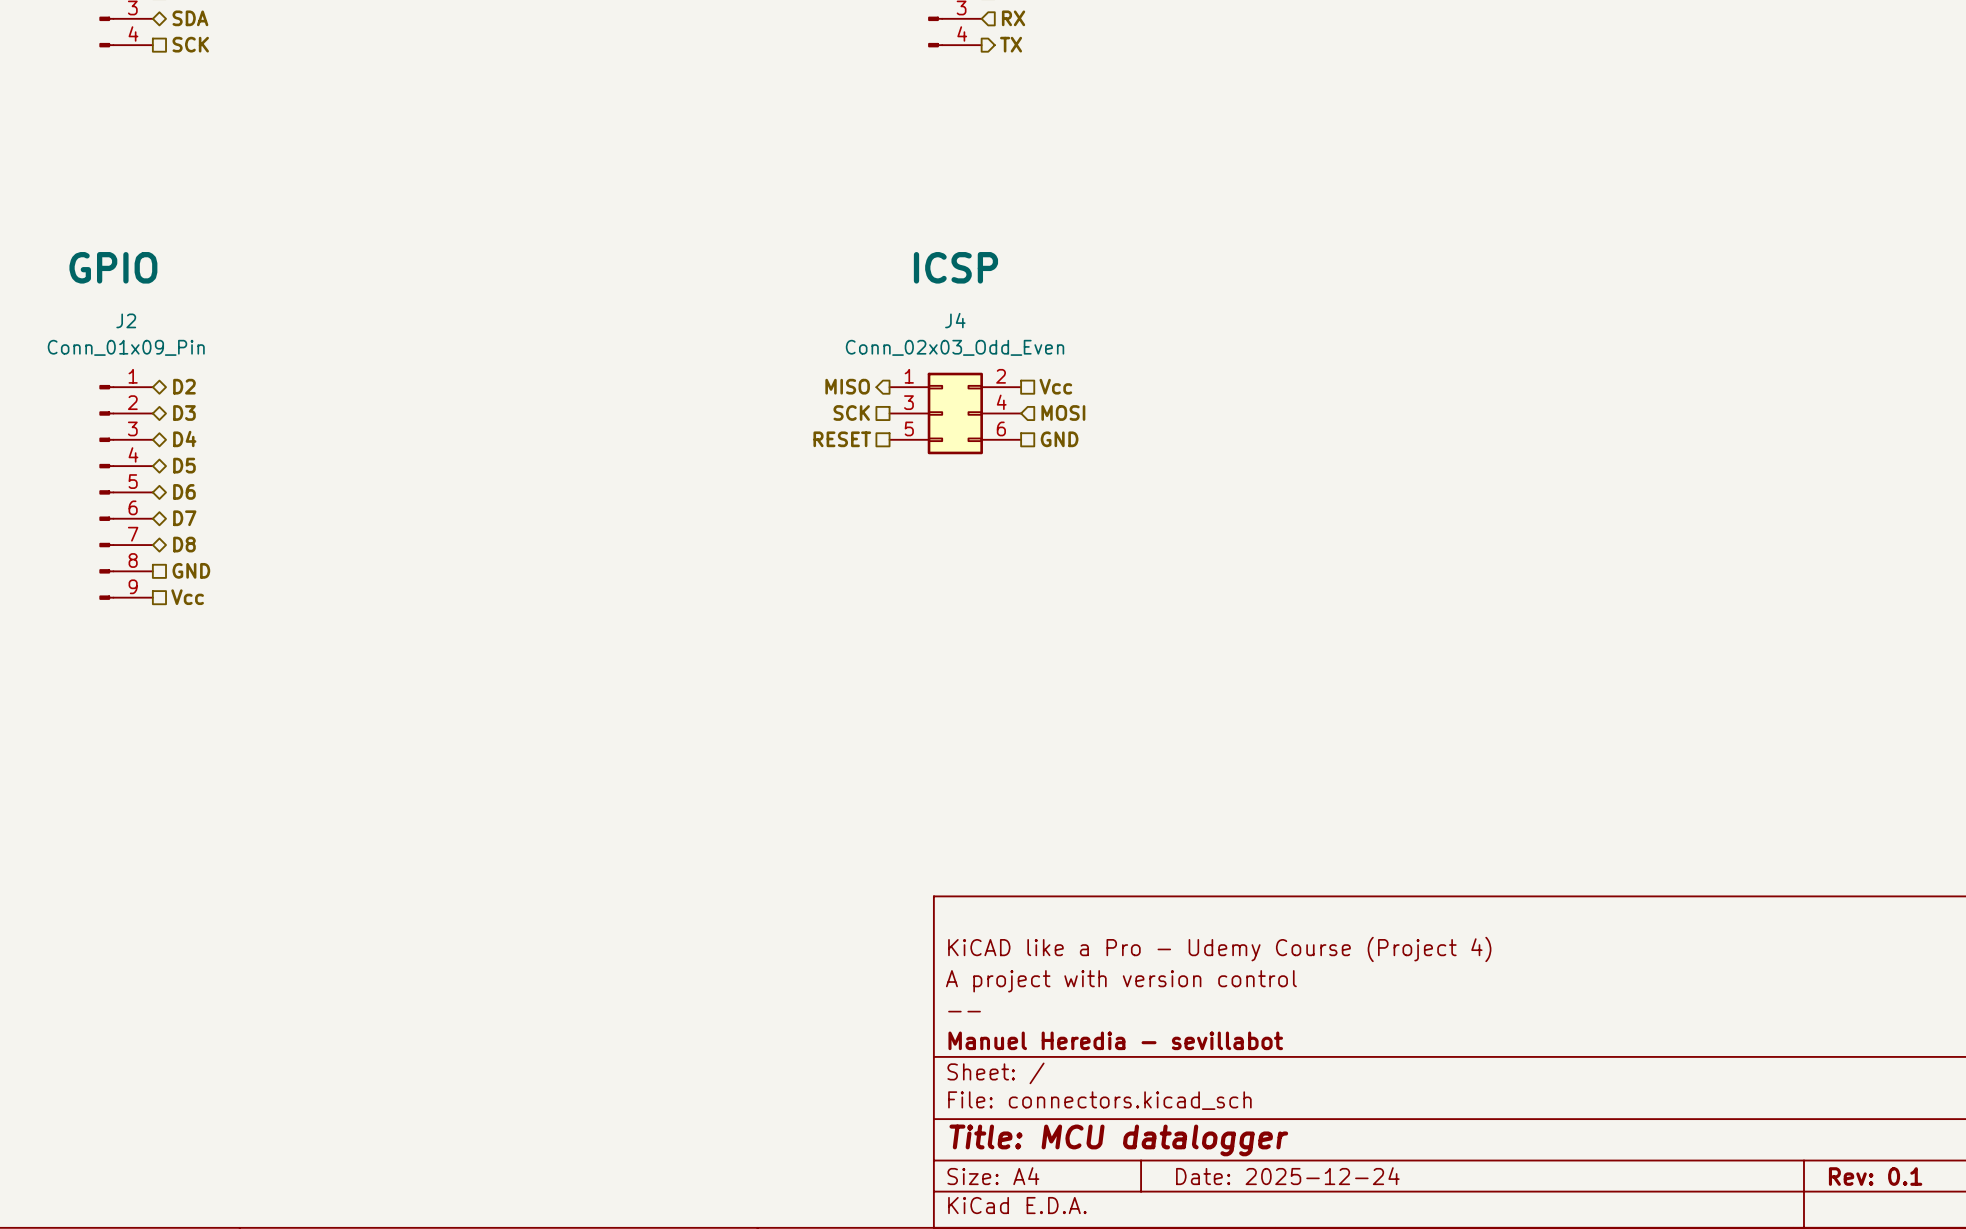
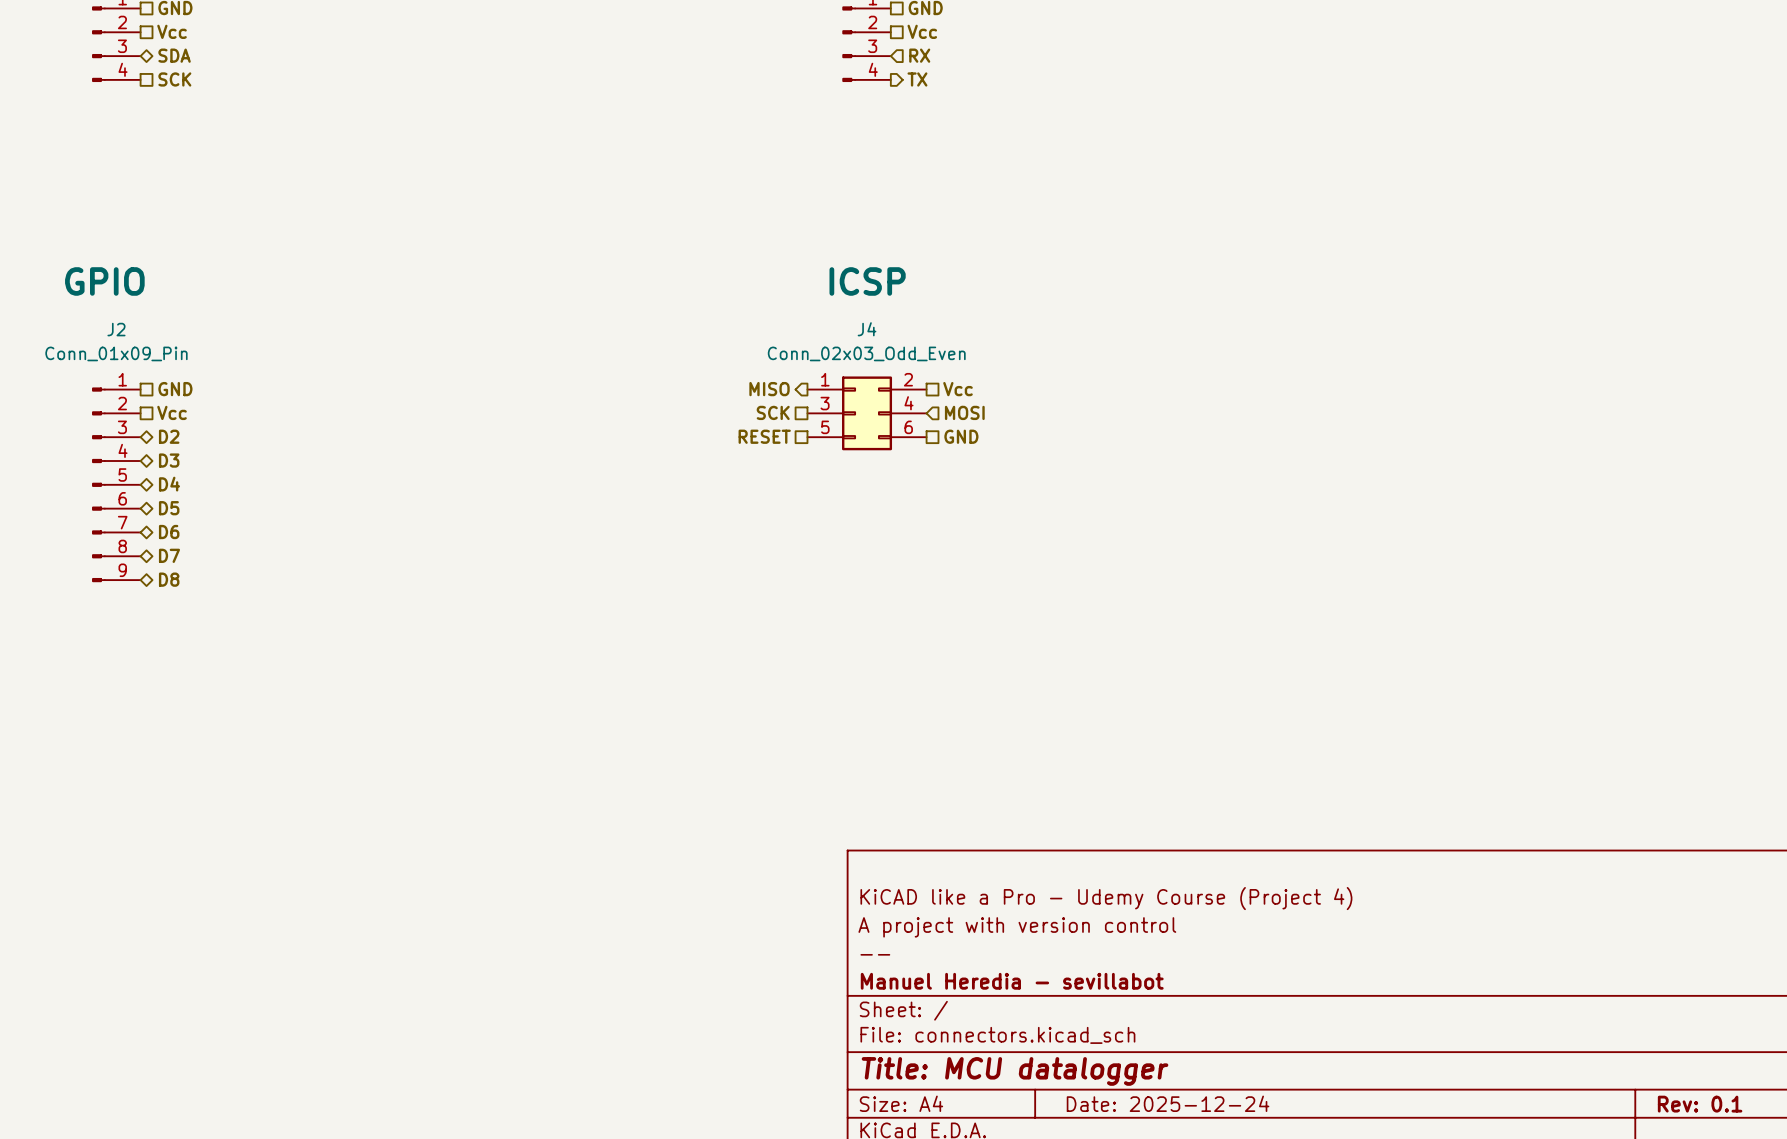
hierarchical label shape: bidirectional (184, 386) -> passive (175, 389)
hierarchical label: D2 (184, 386) -> GND (175, 389)
hierarchical label shape: bidirectional (184, 412) -> passive (172, 412)
hierarchical label: D3 (184, 412) -> Vcc (172, 412)
hierarchical label: D4 (184, 438) -> D2 (169, 436)
hierarchical label: D5 (184, 465) -> D3 (169, 460)
hierarchical label: D6 (184, 491) -> D4 (169, 484)
hierarchical label: D7 (184, 518) -> D5 (169, 508)
hierarchical label: D8 (184, 544) -> D6 (169, 532)
hierarchical label shape: passive (191, 570) -> bidirectional (169, 555)
hierarchical label: GND (191, 570) -> D7 (169, 555)
hierarchical label shape: passive (187, 597) -> bidirectional (169, 579)
hierarchical label: Vcc (187, 597) -> D8 (169, 579)

